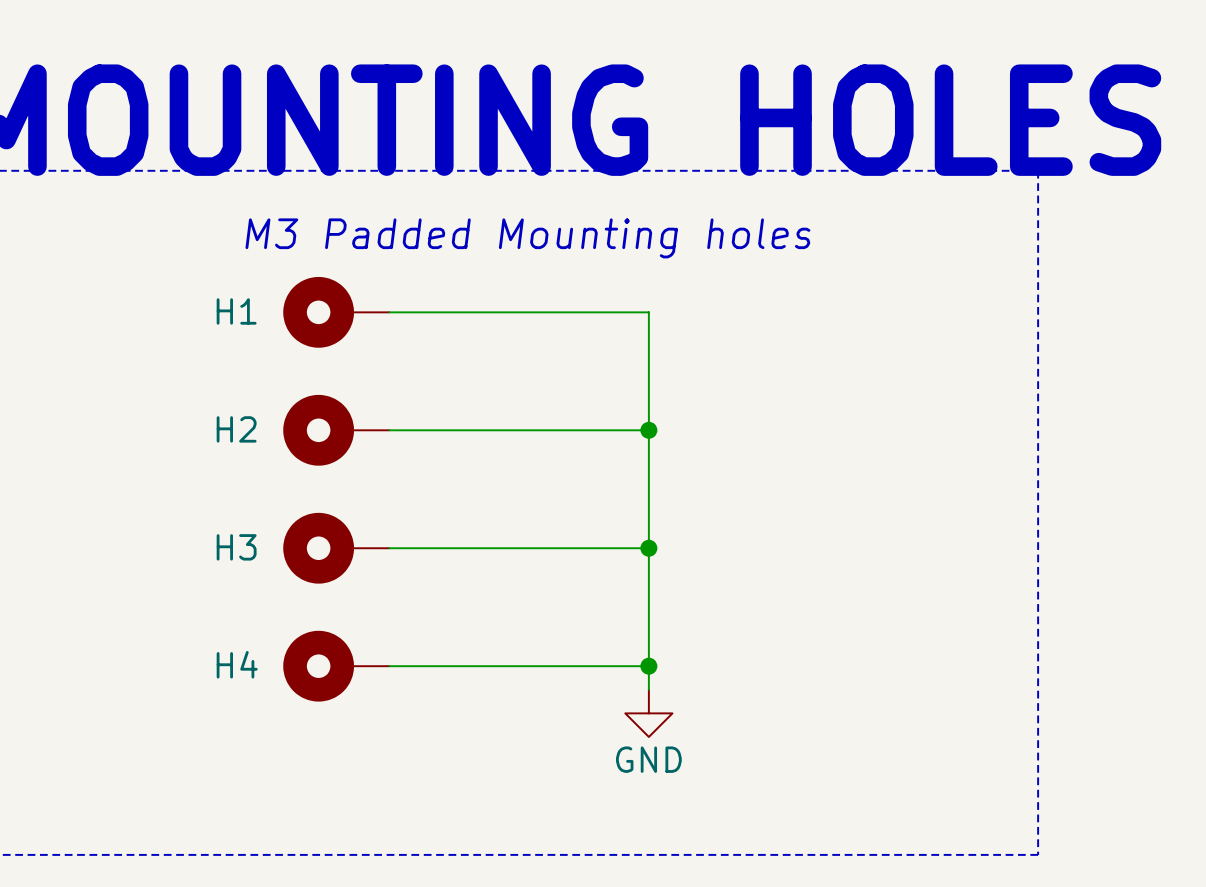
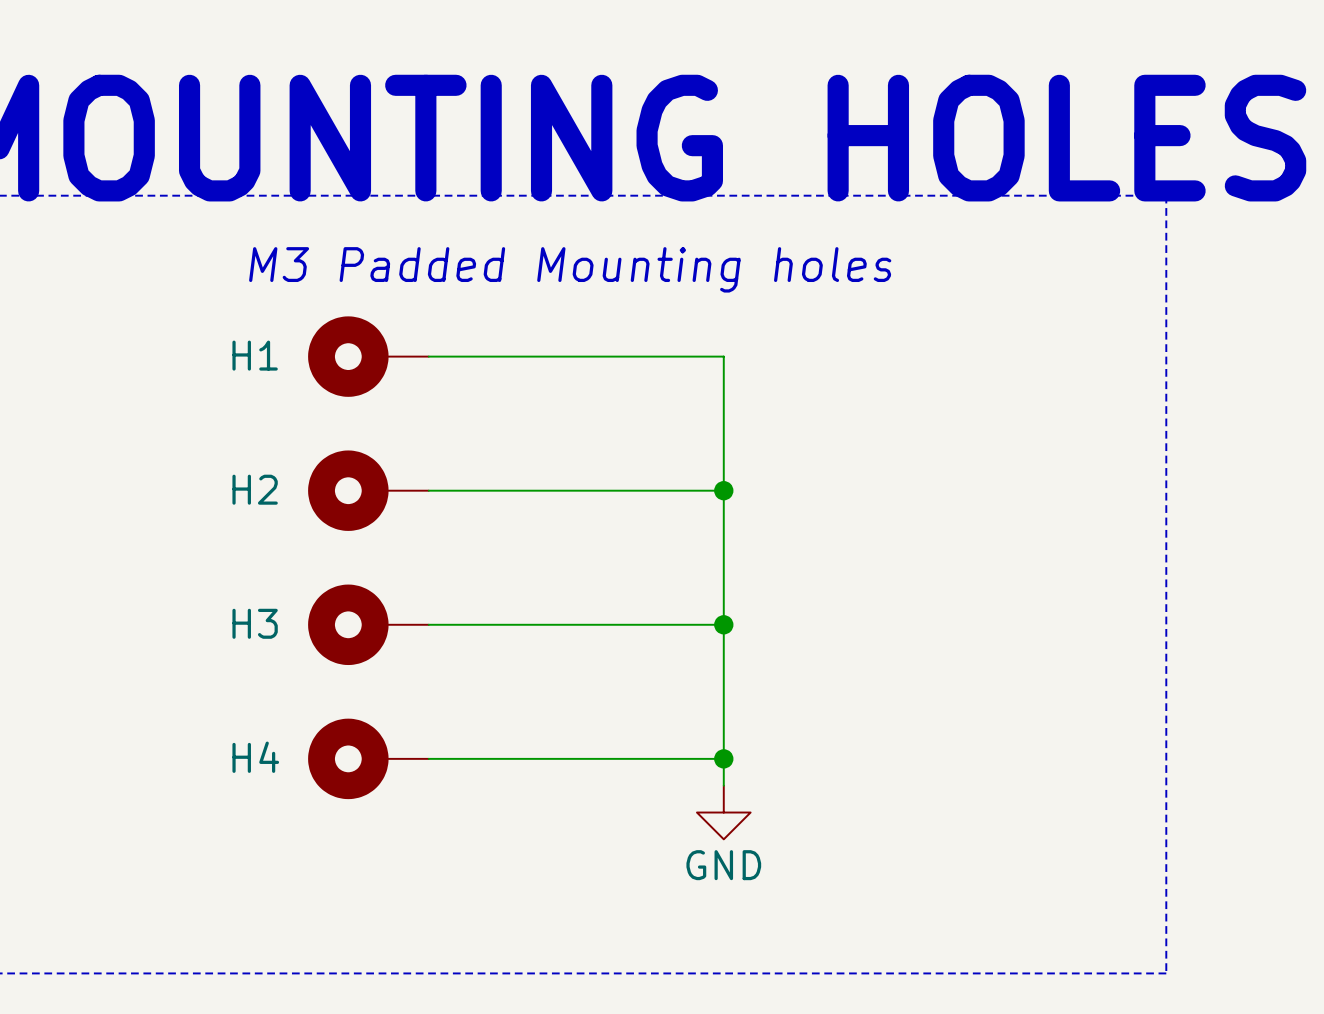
text position: M3 Padded Mounting holes (527, 238) -> M3 Padded Mounting holes (570, 269)

